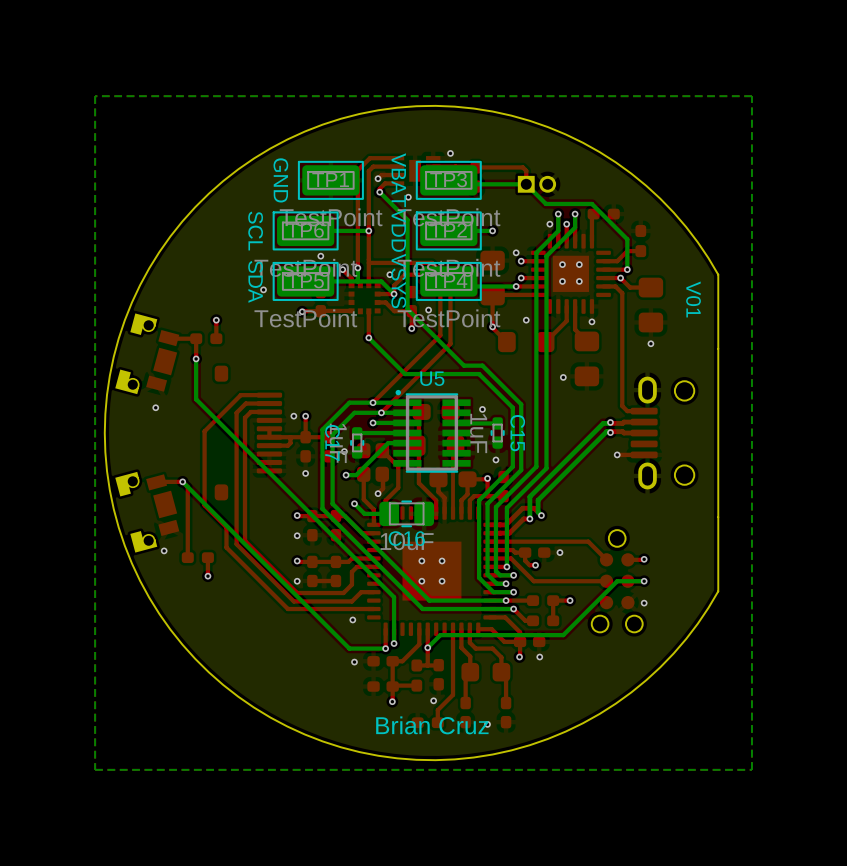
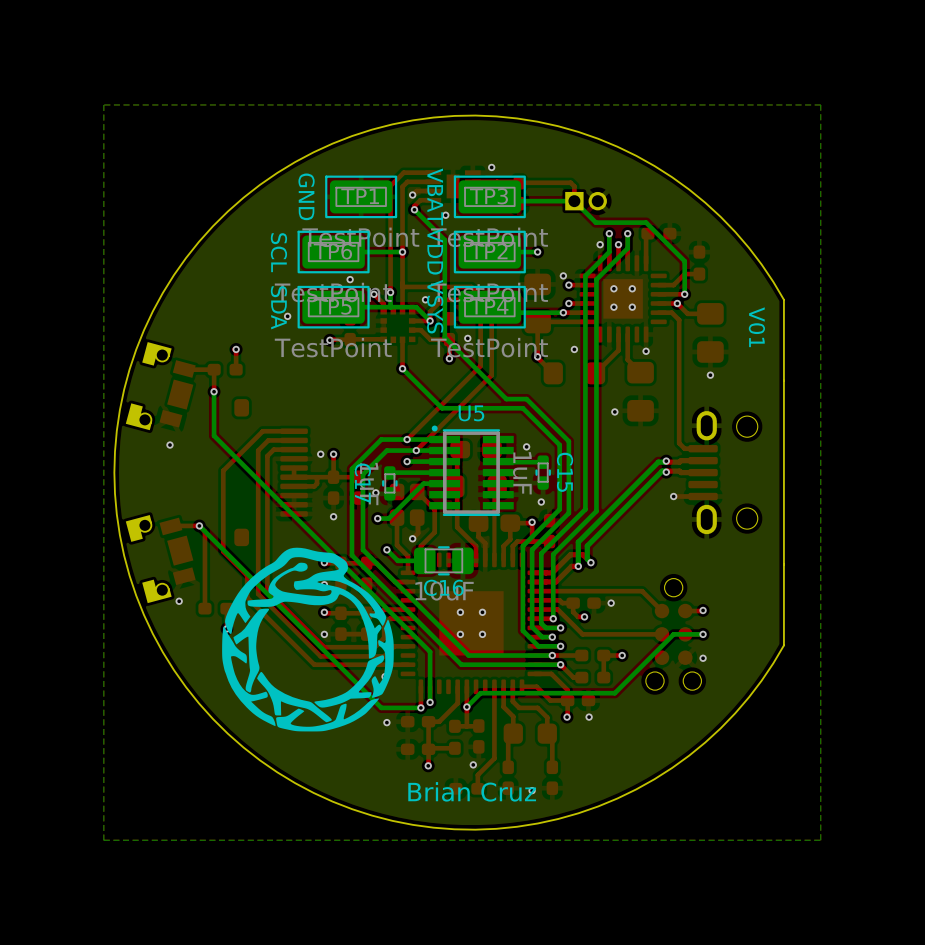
drawing: none -> [222, 547, 394, 732]

